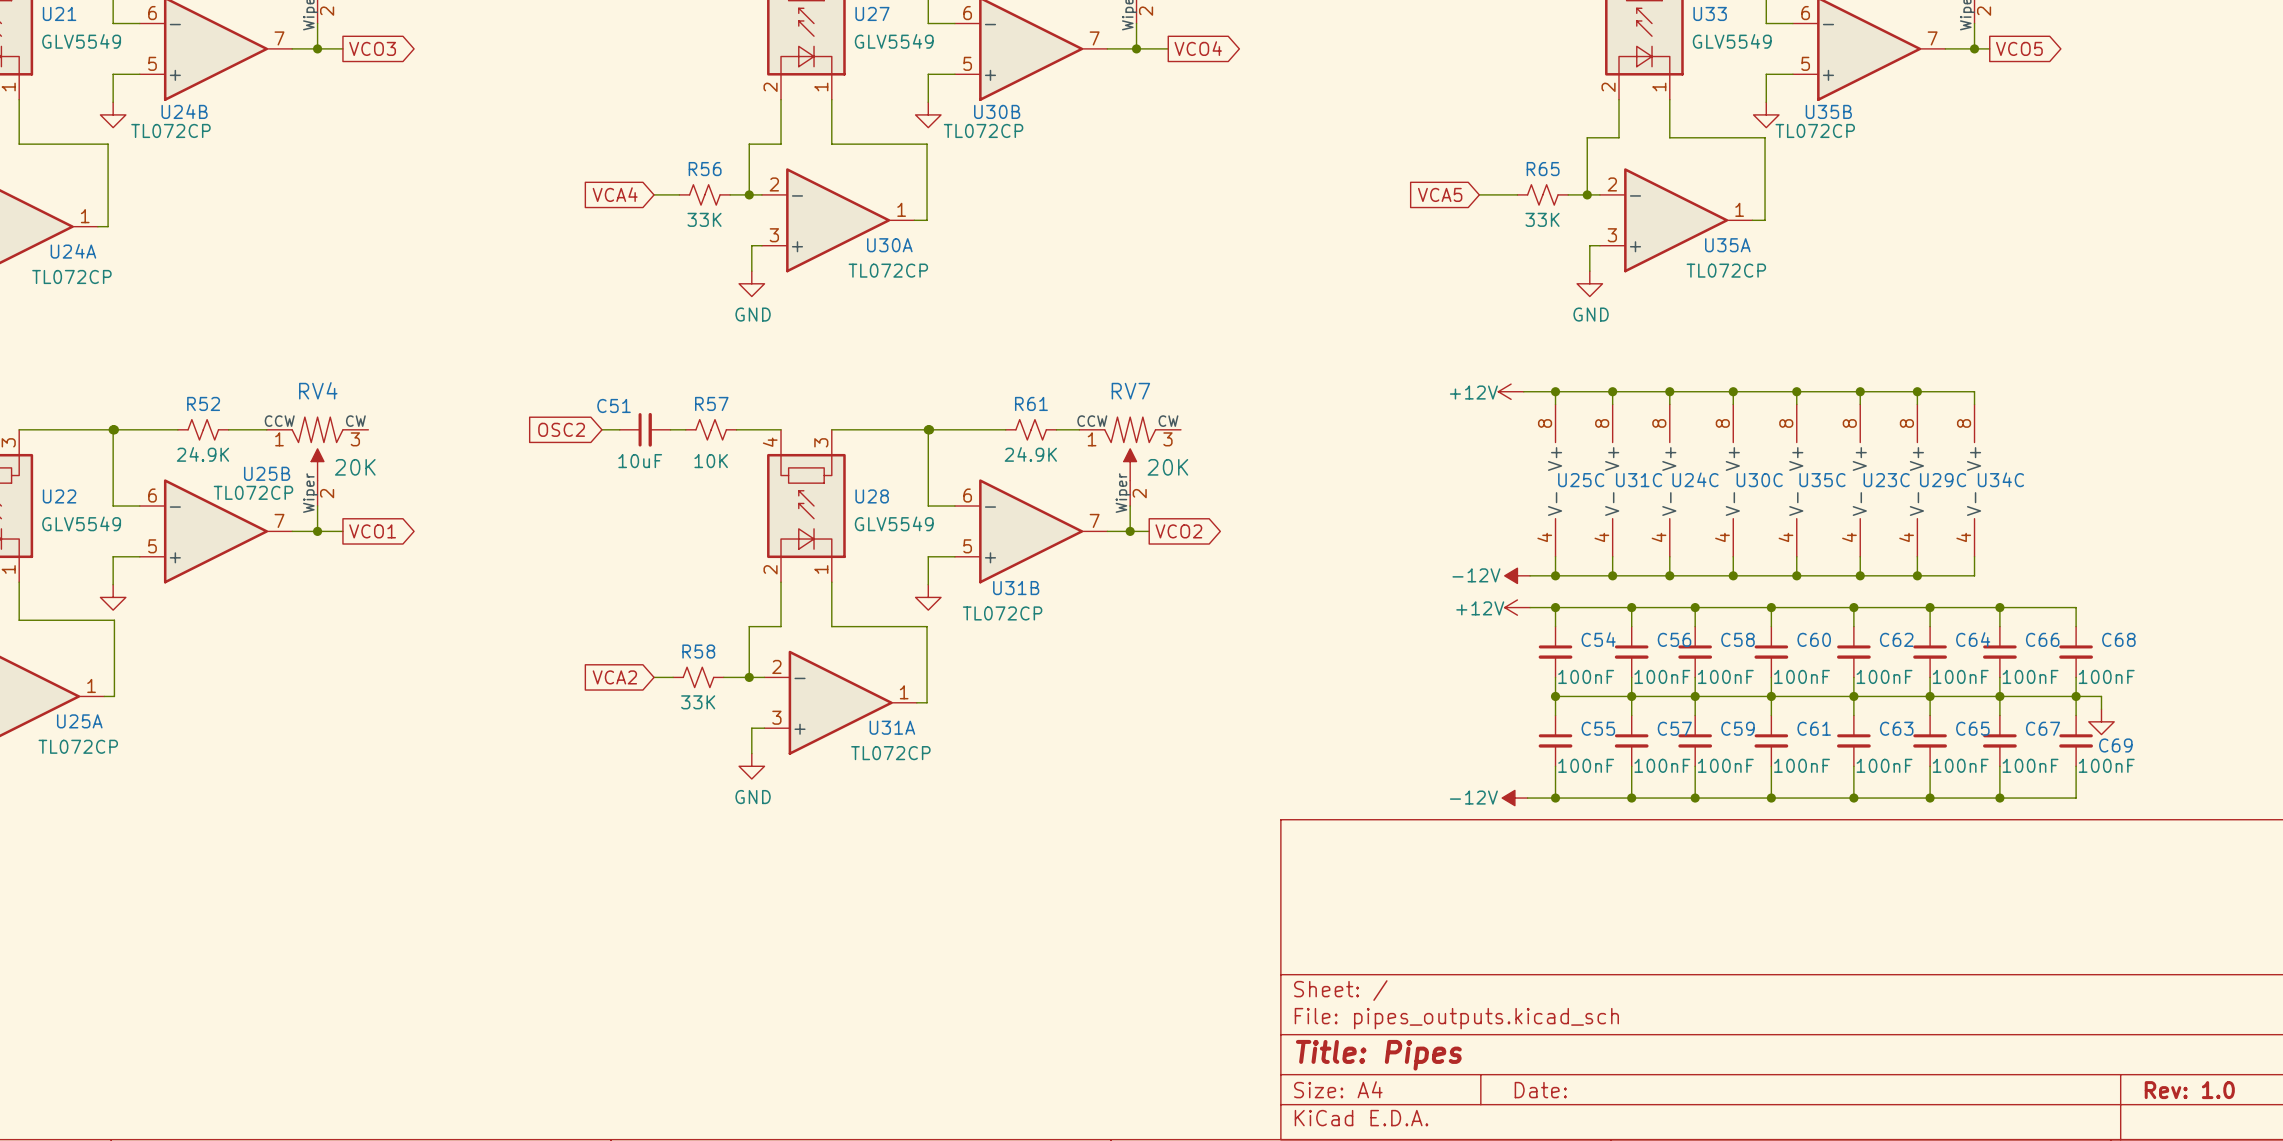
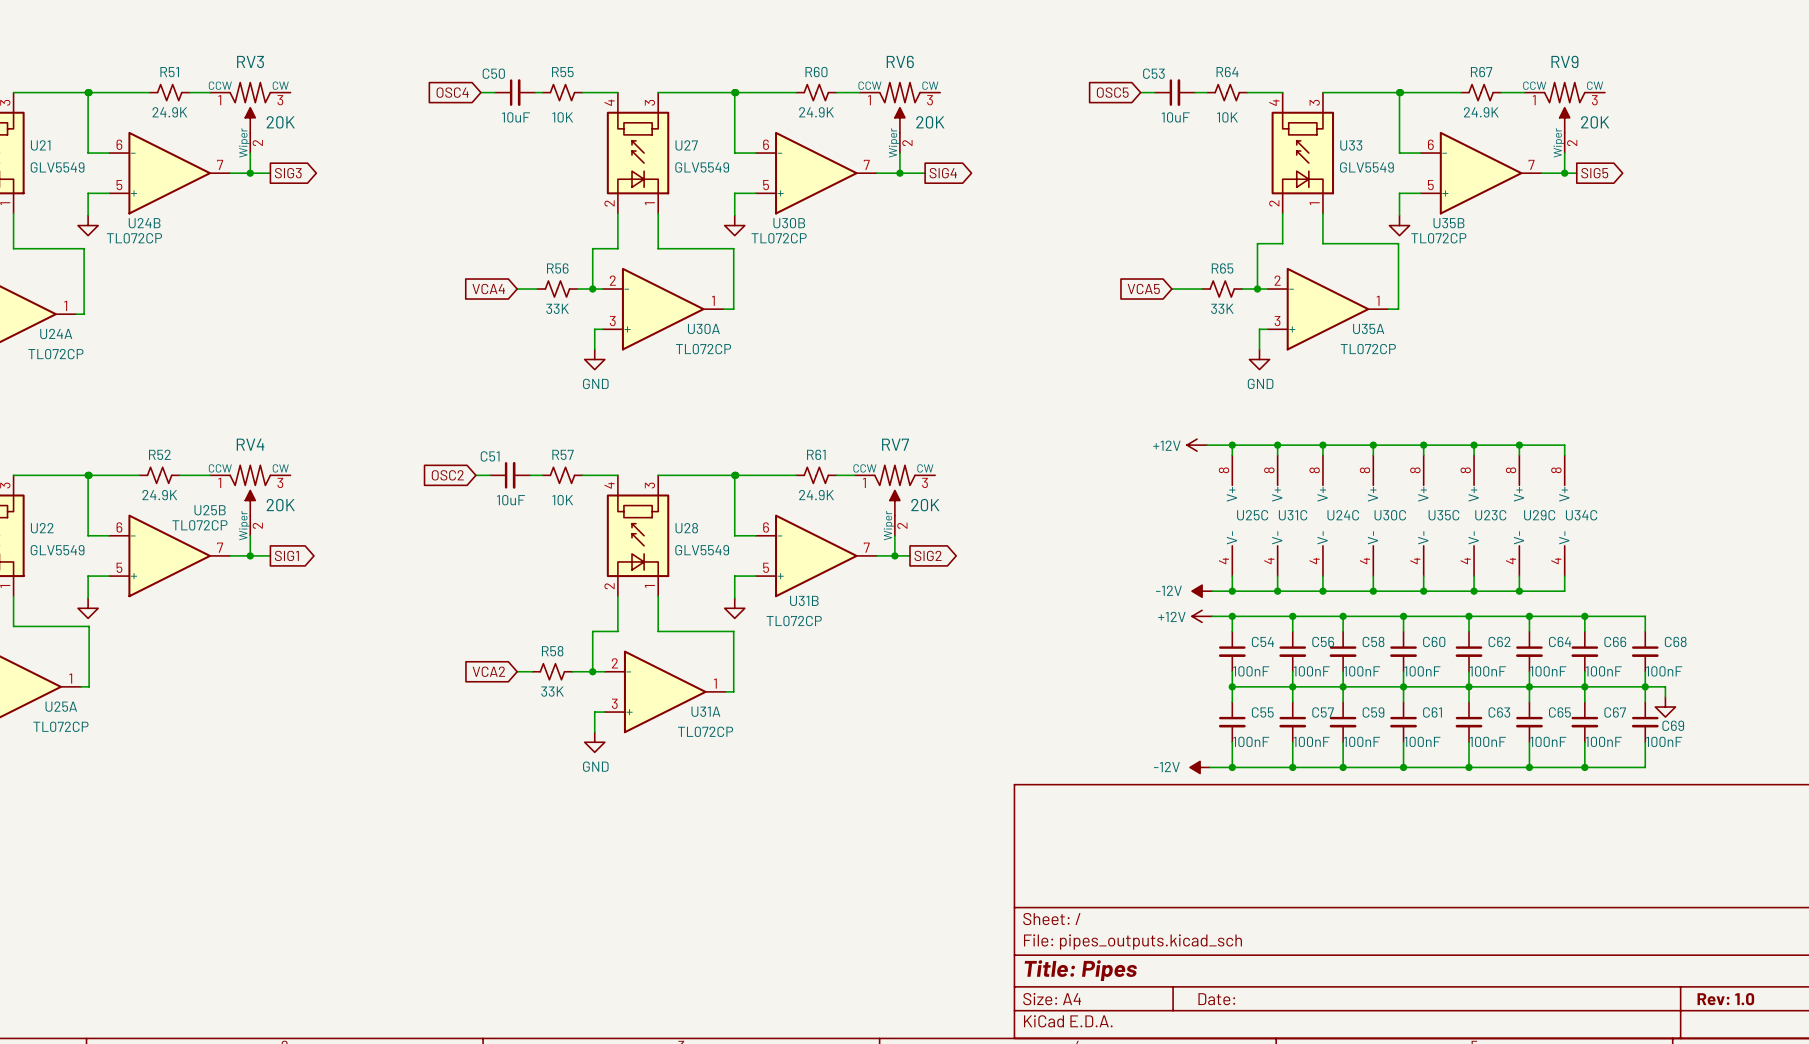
global label: VCO3 (372, 48) -> SIG3 (288, 173)
global label: VCO4 (1198, 48) -> SIG4 (943, 173)
global label: VCO5 (2019, 48) -> SIG5 (1594, 173)
global label: VCO1 (372, 531) -> SIG1 (286, 555)
global label: VCO2 (1178, 531) -> SIG2 (928, 555)

